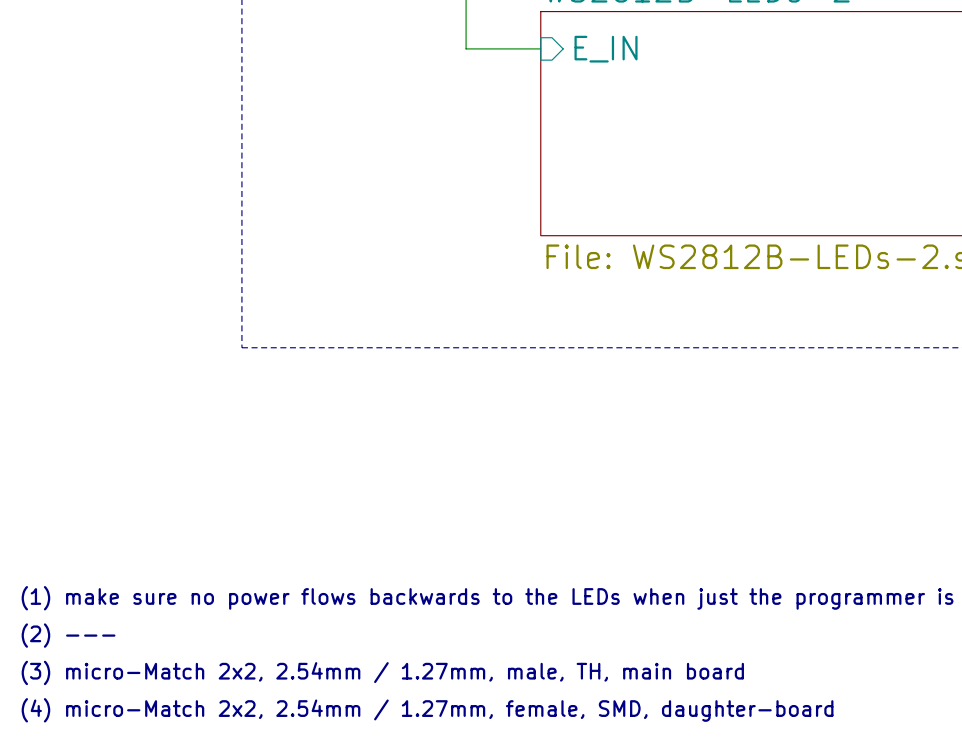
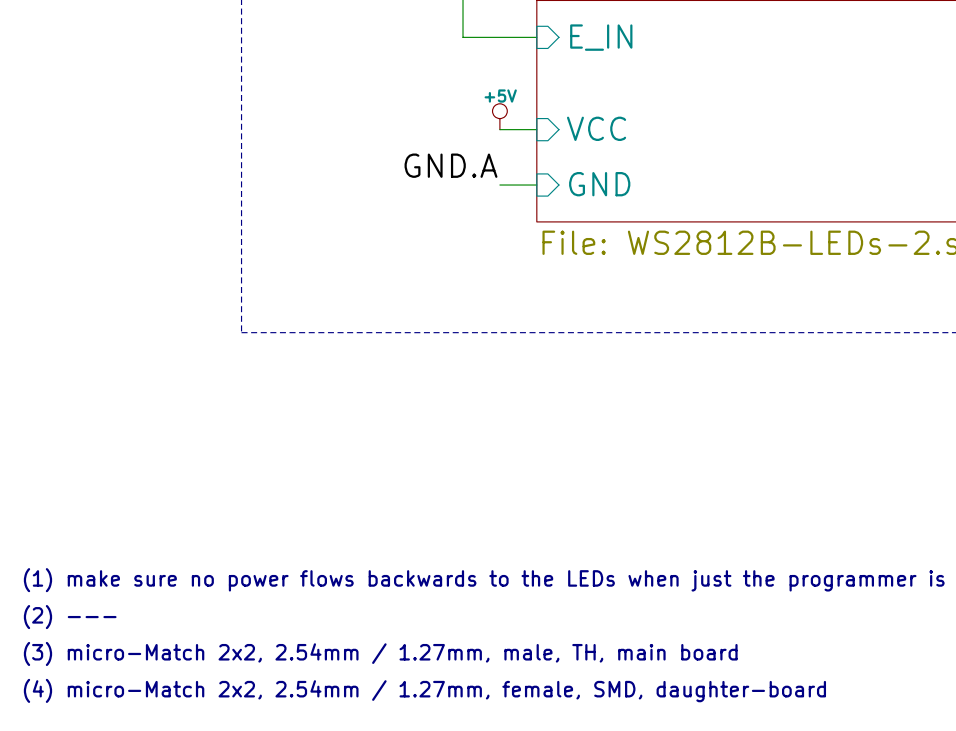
power symbol: none -> +5V (499, 116)
sheet pin: none -> VCC (596, 128)
wire: none -> (499, 129) (536, 129)
label: none -> GND.A (451, 165)
sheet pin: none -> GND (599, 184)
wire: none -> (499, 185) (536, 185)

